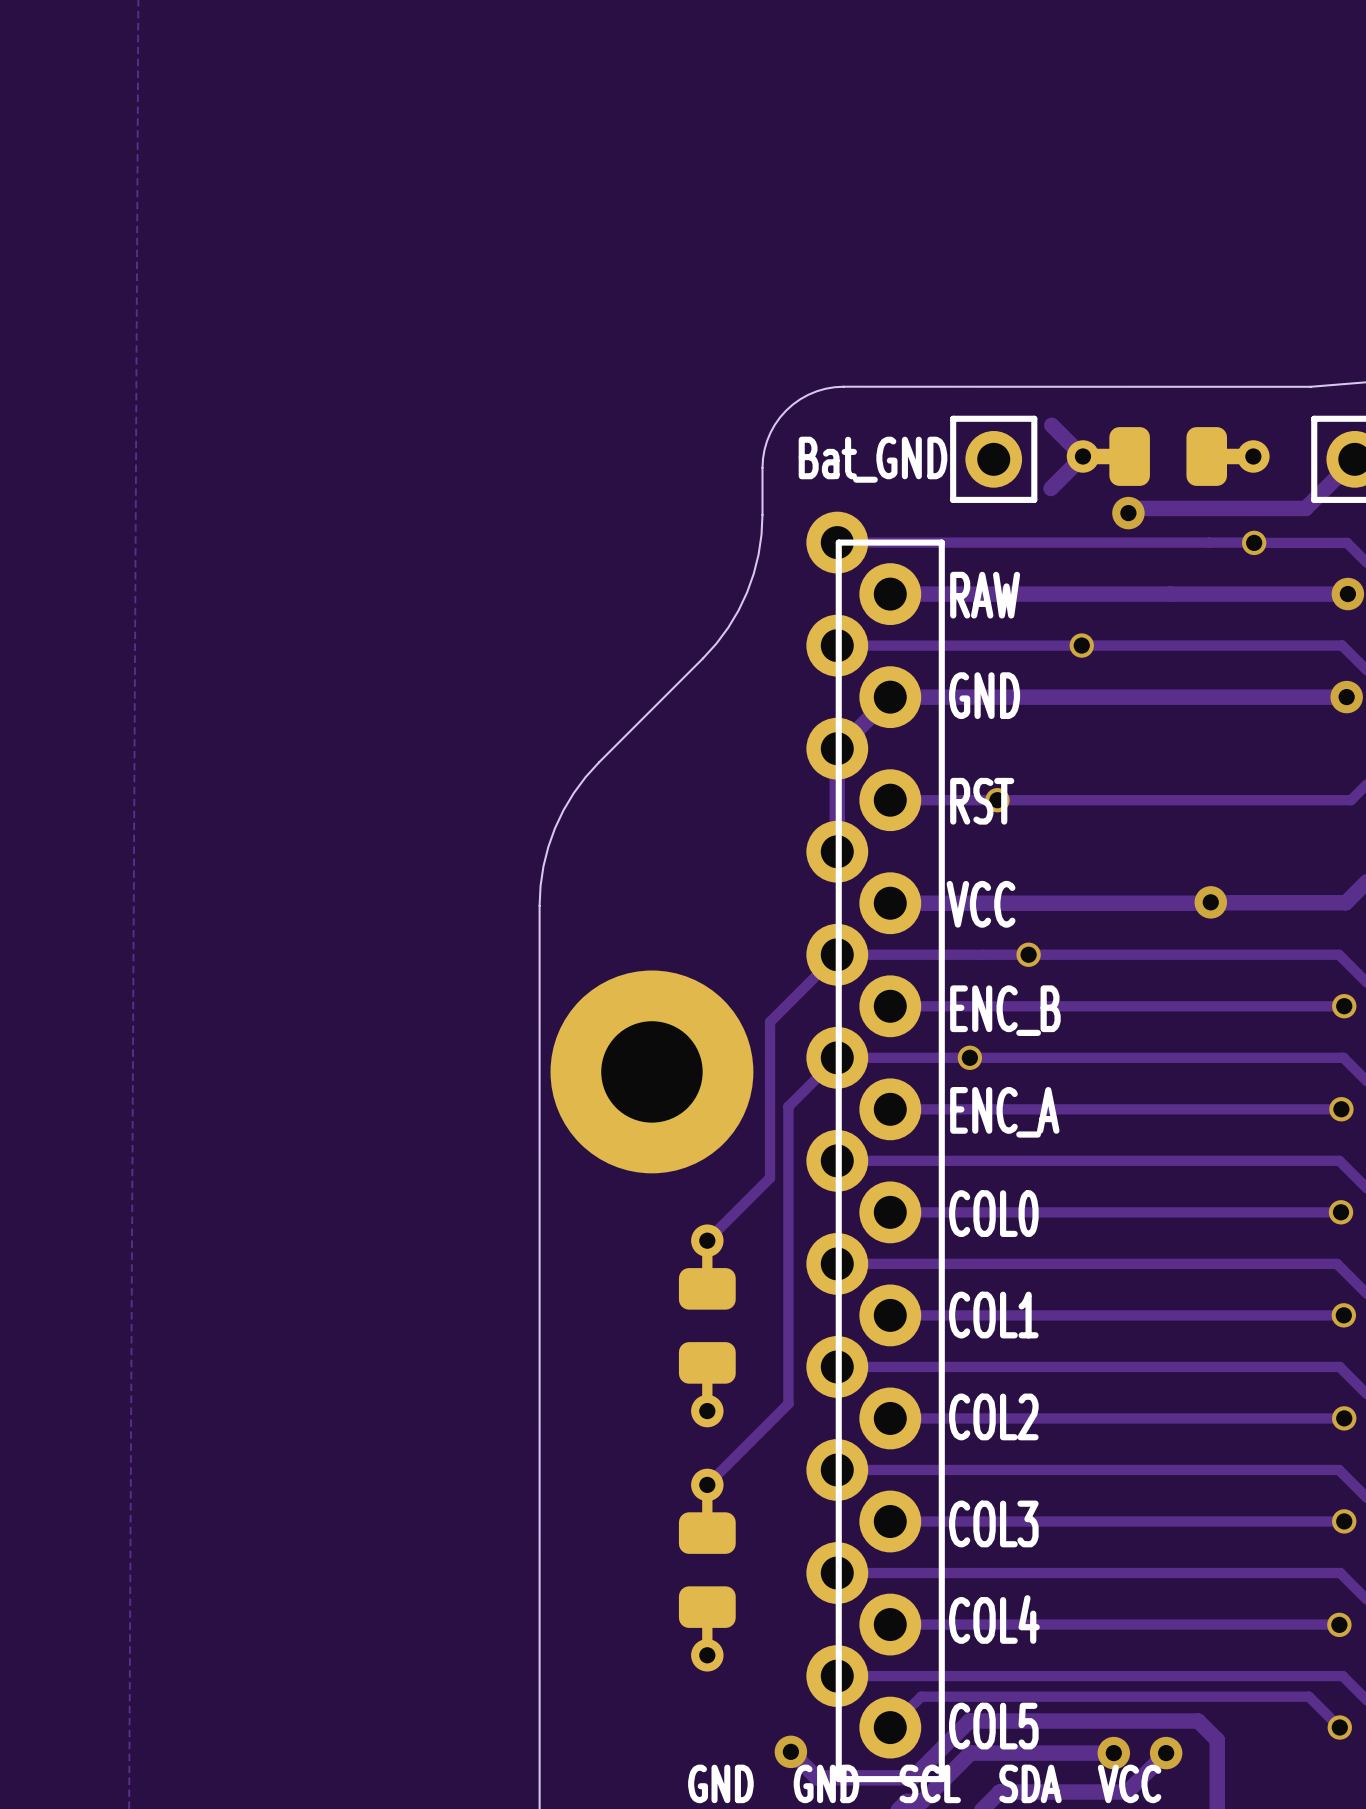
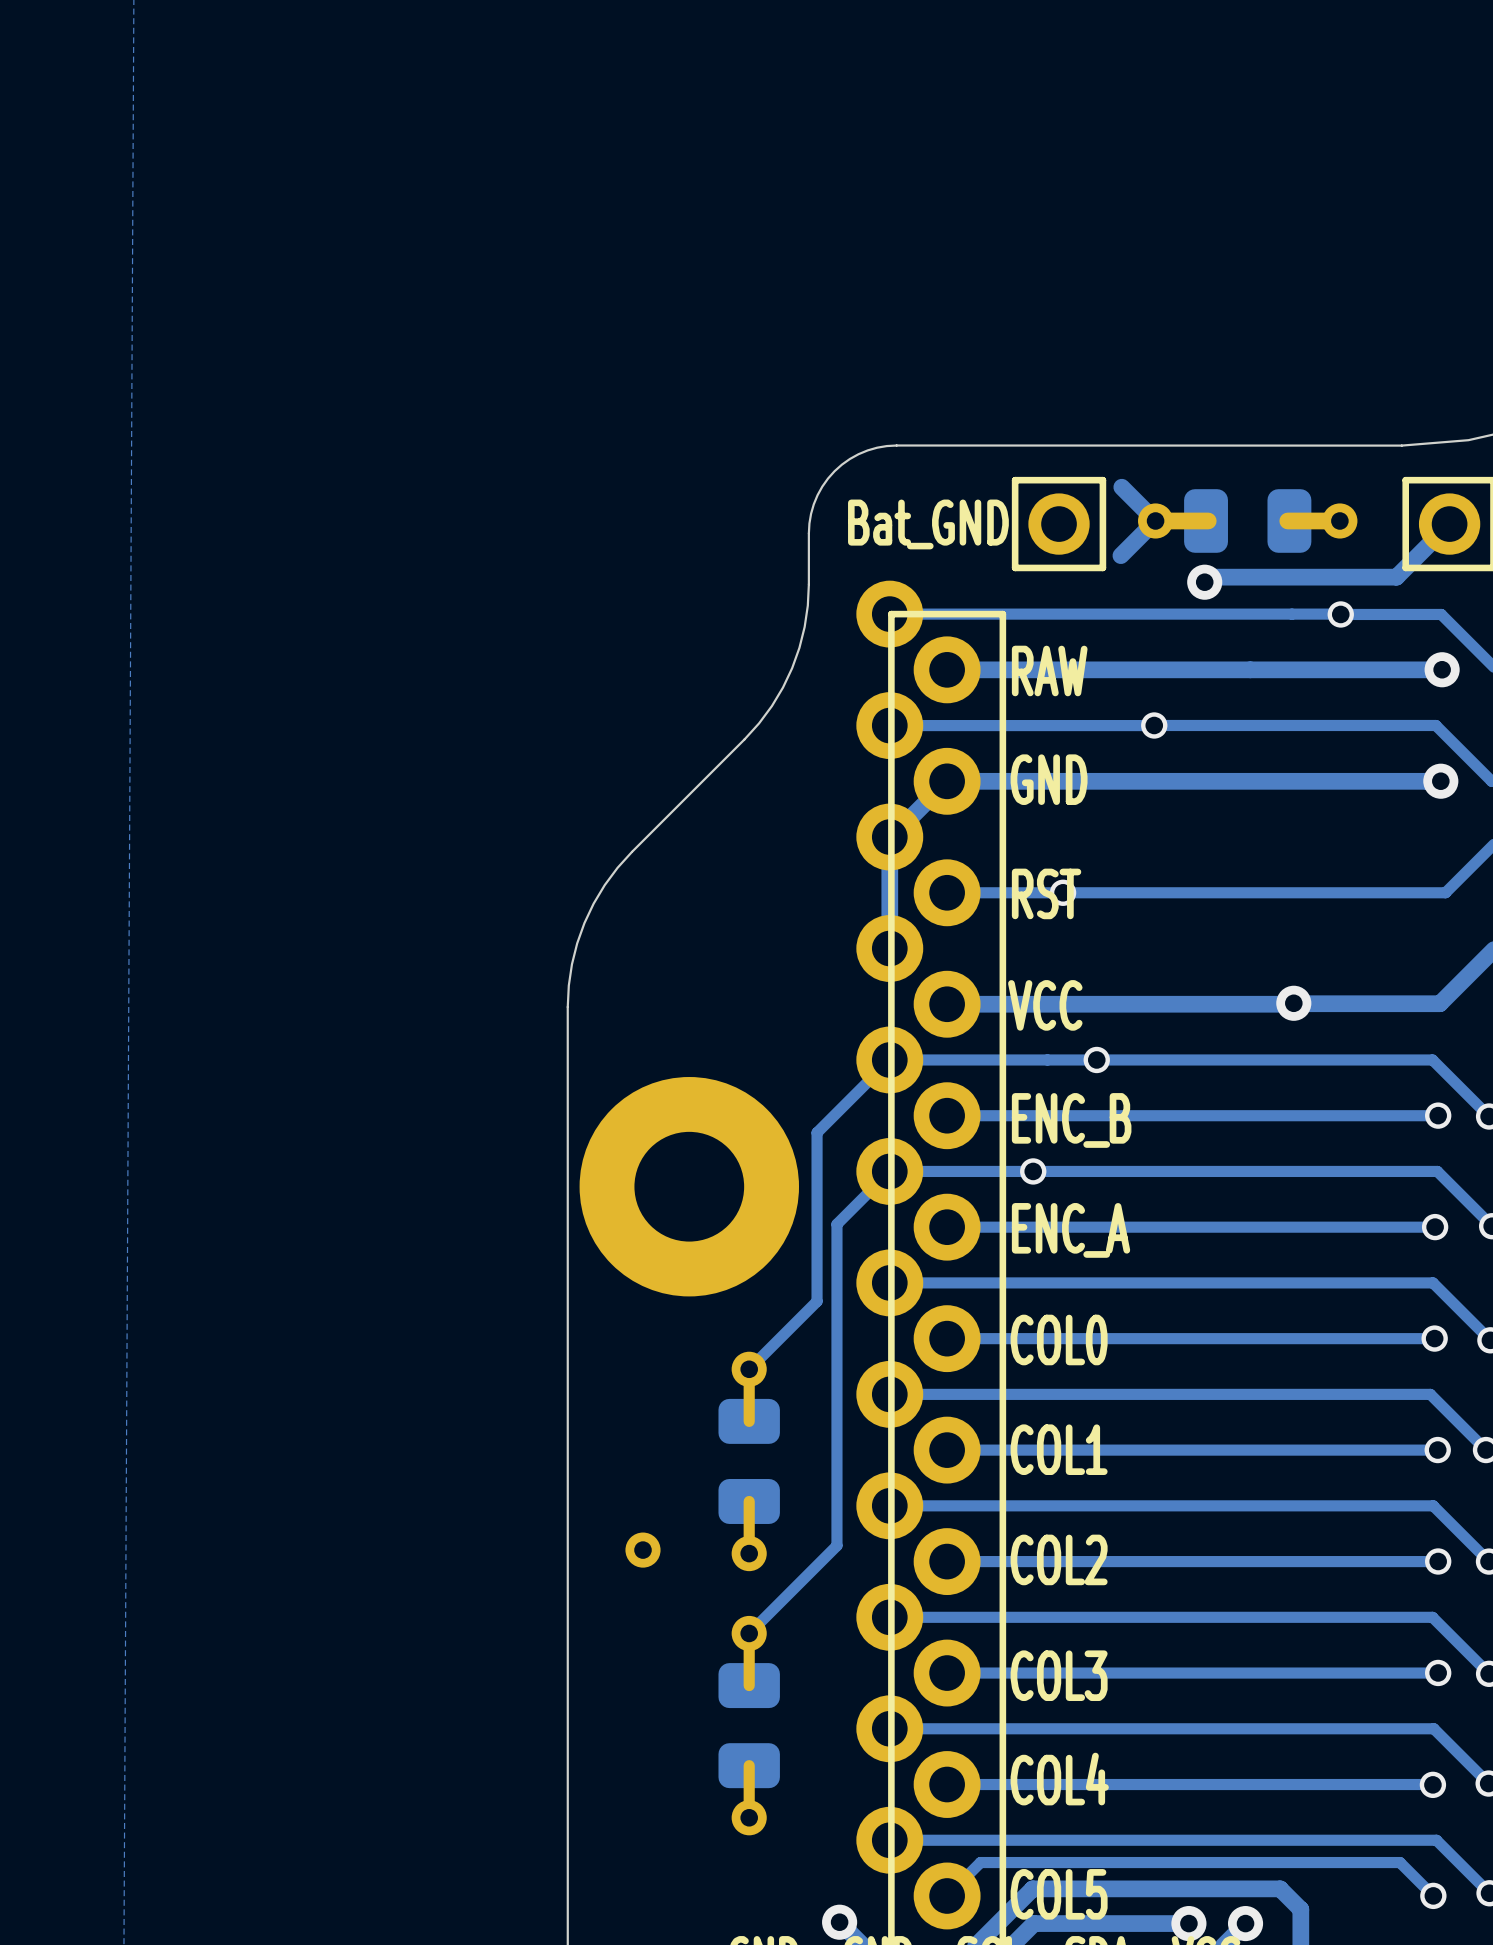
part: none -> (643, 1550)

